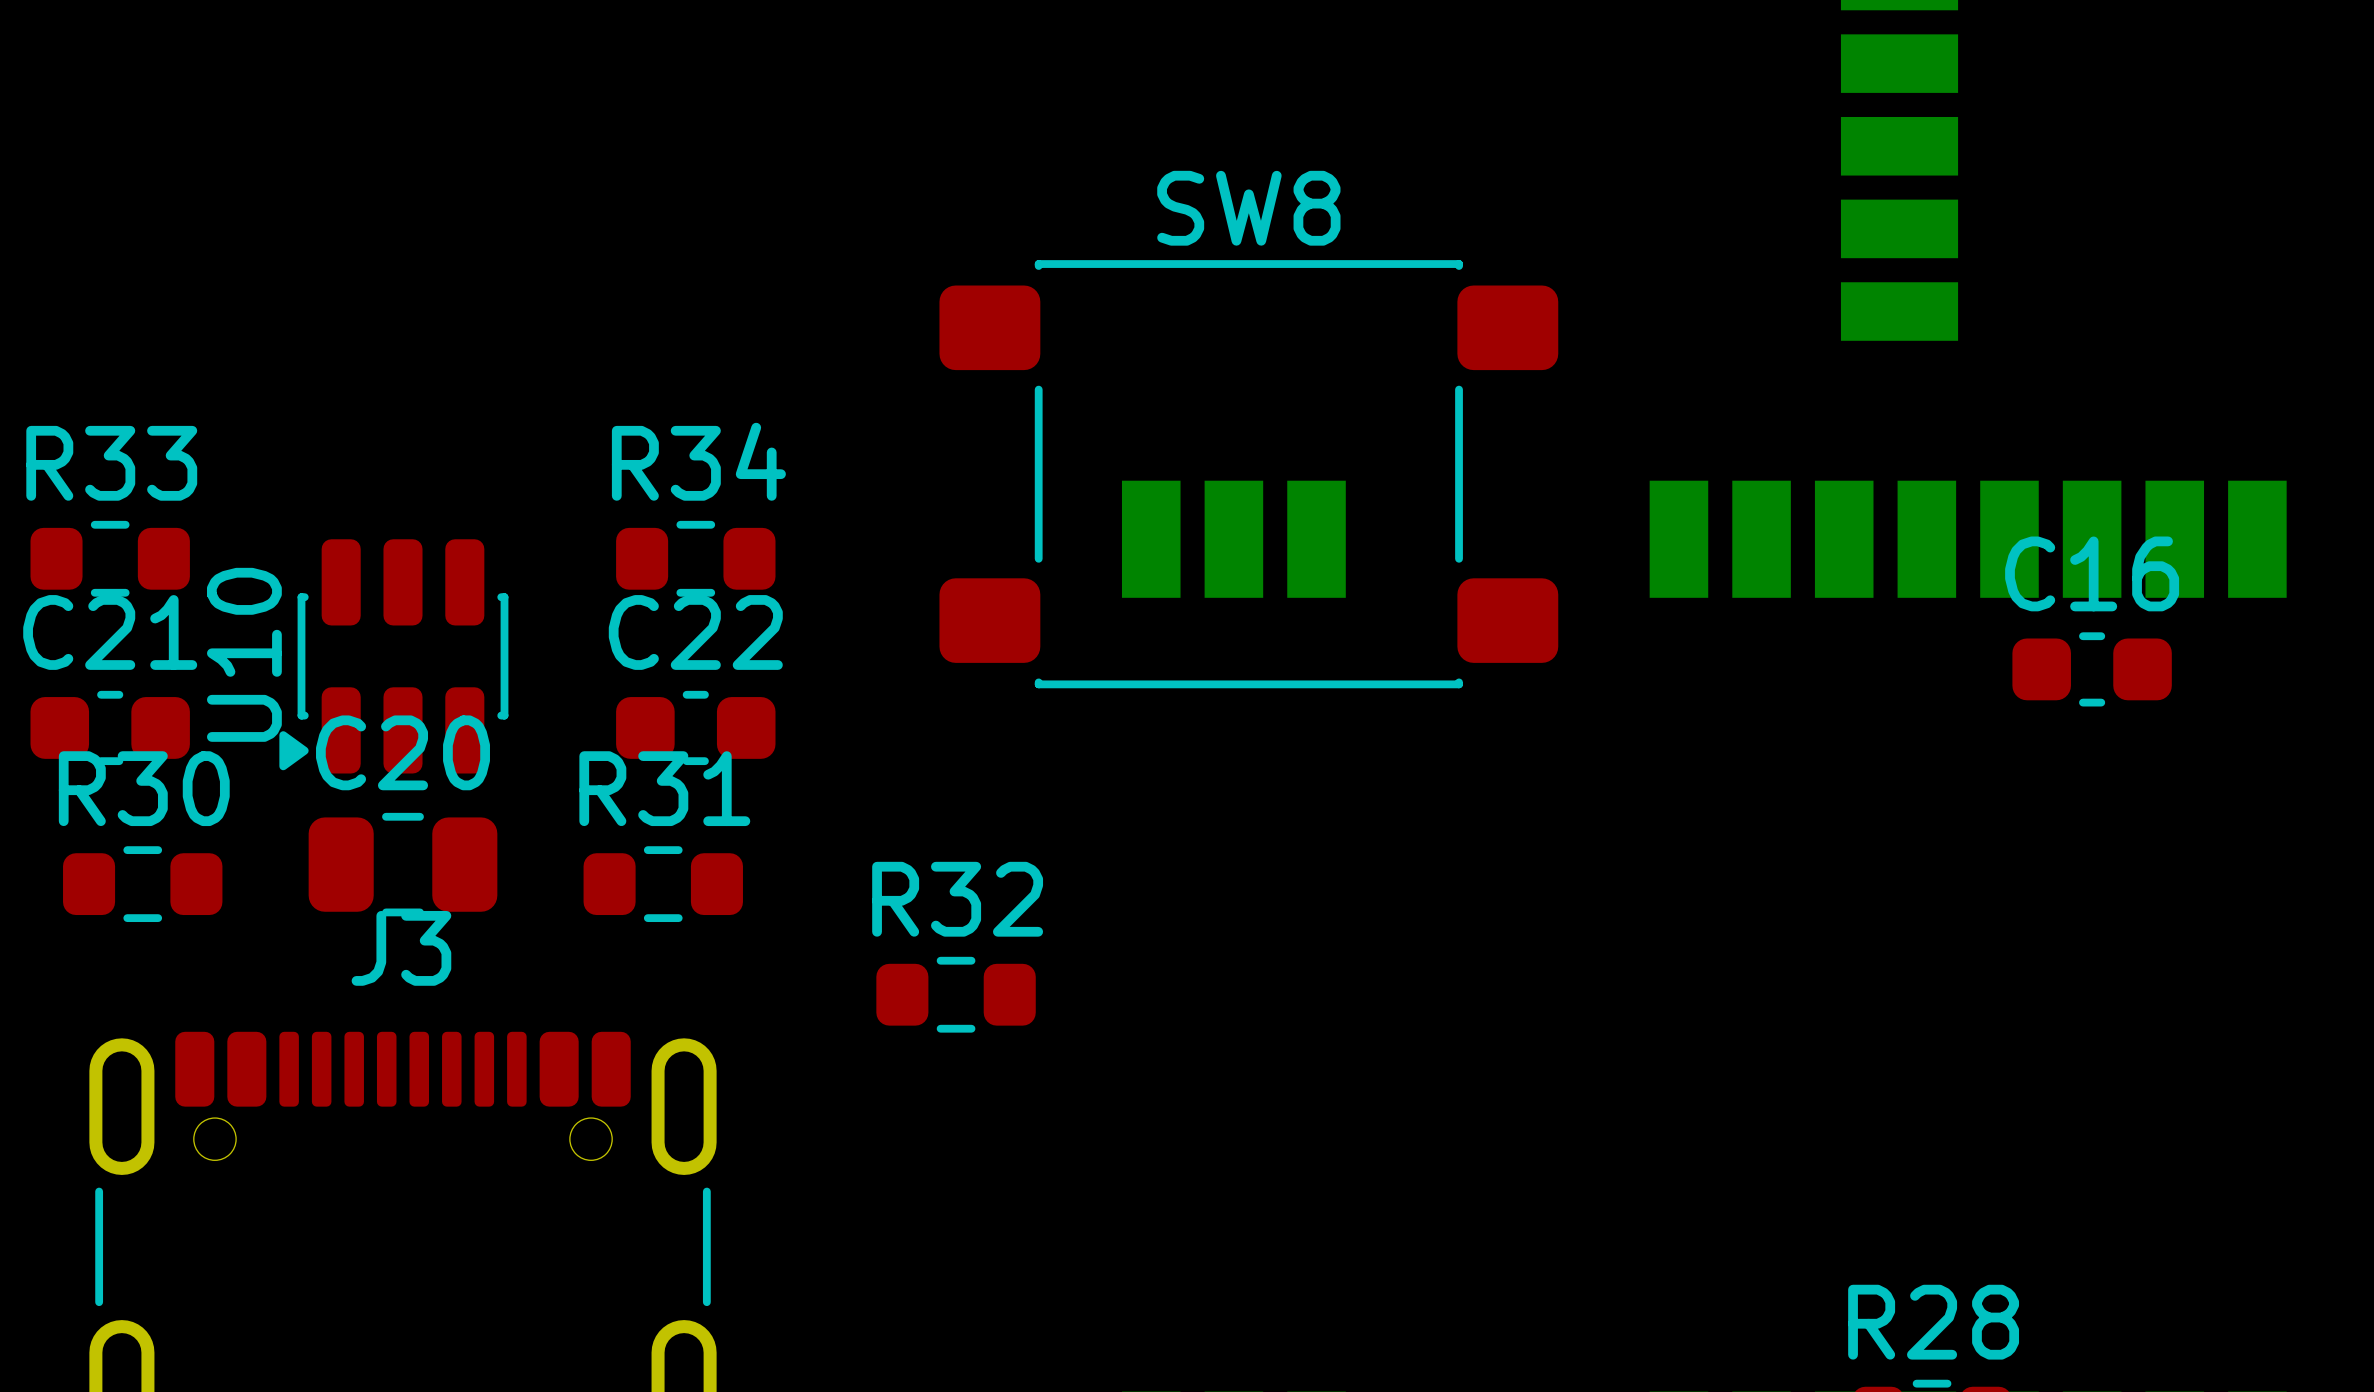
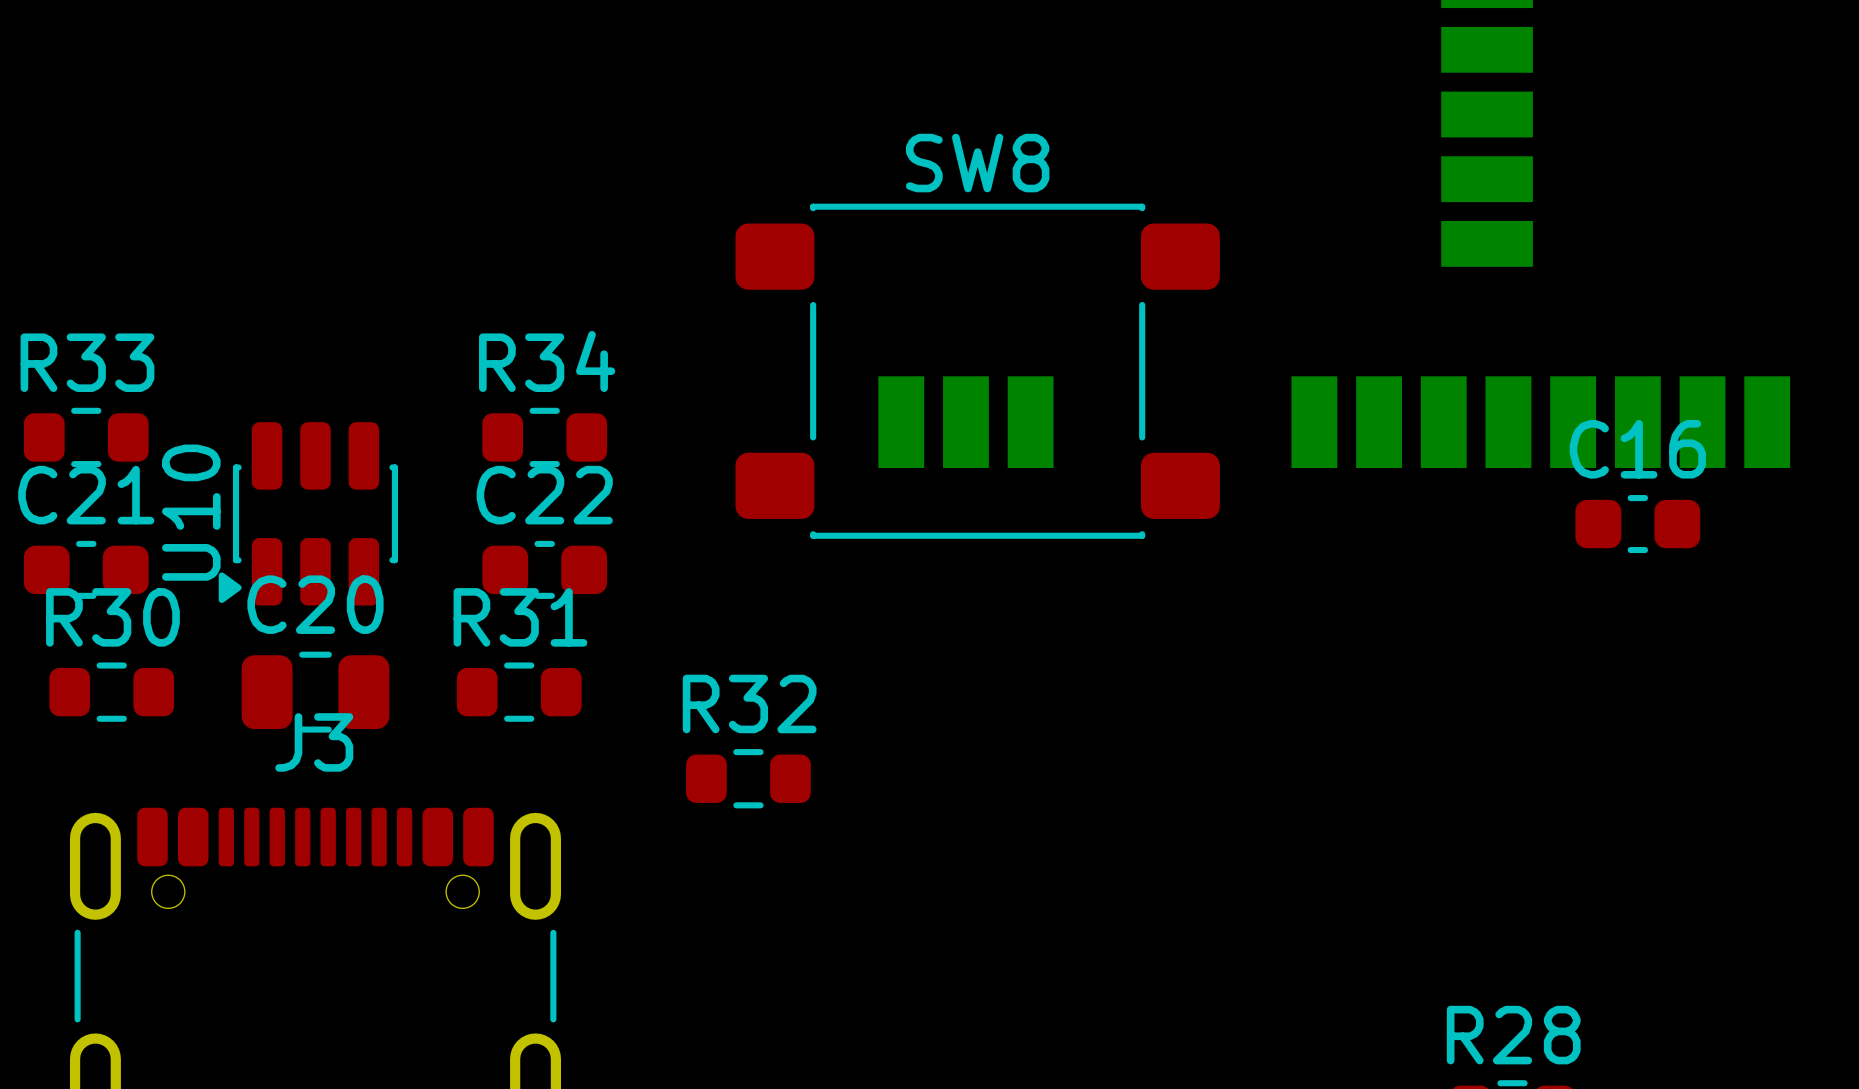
C20 position: (402, 864) -> (315, 692)

